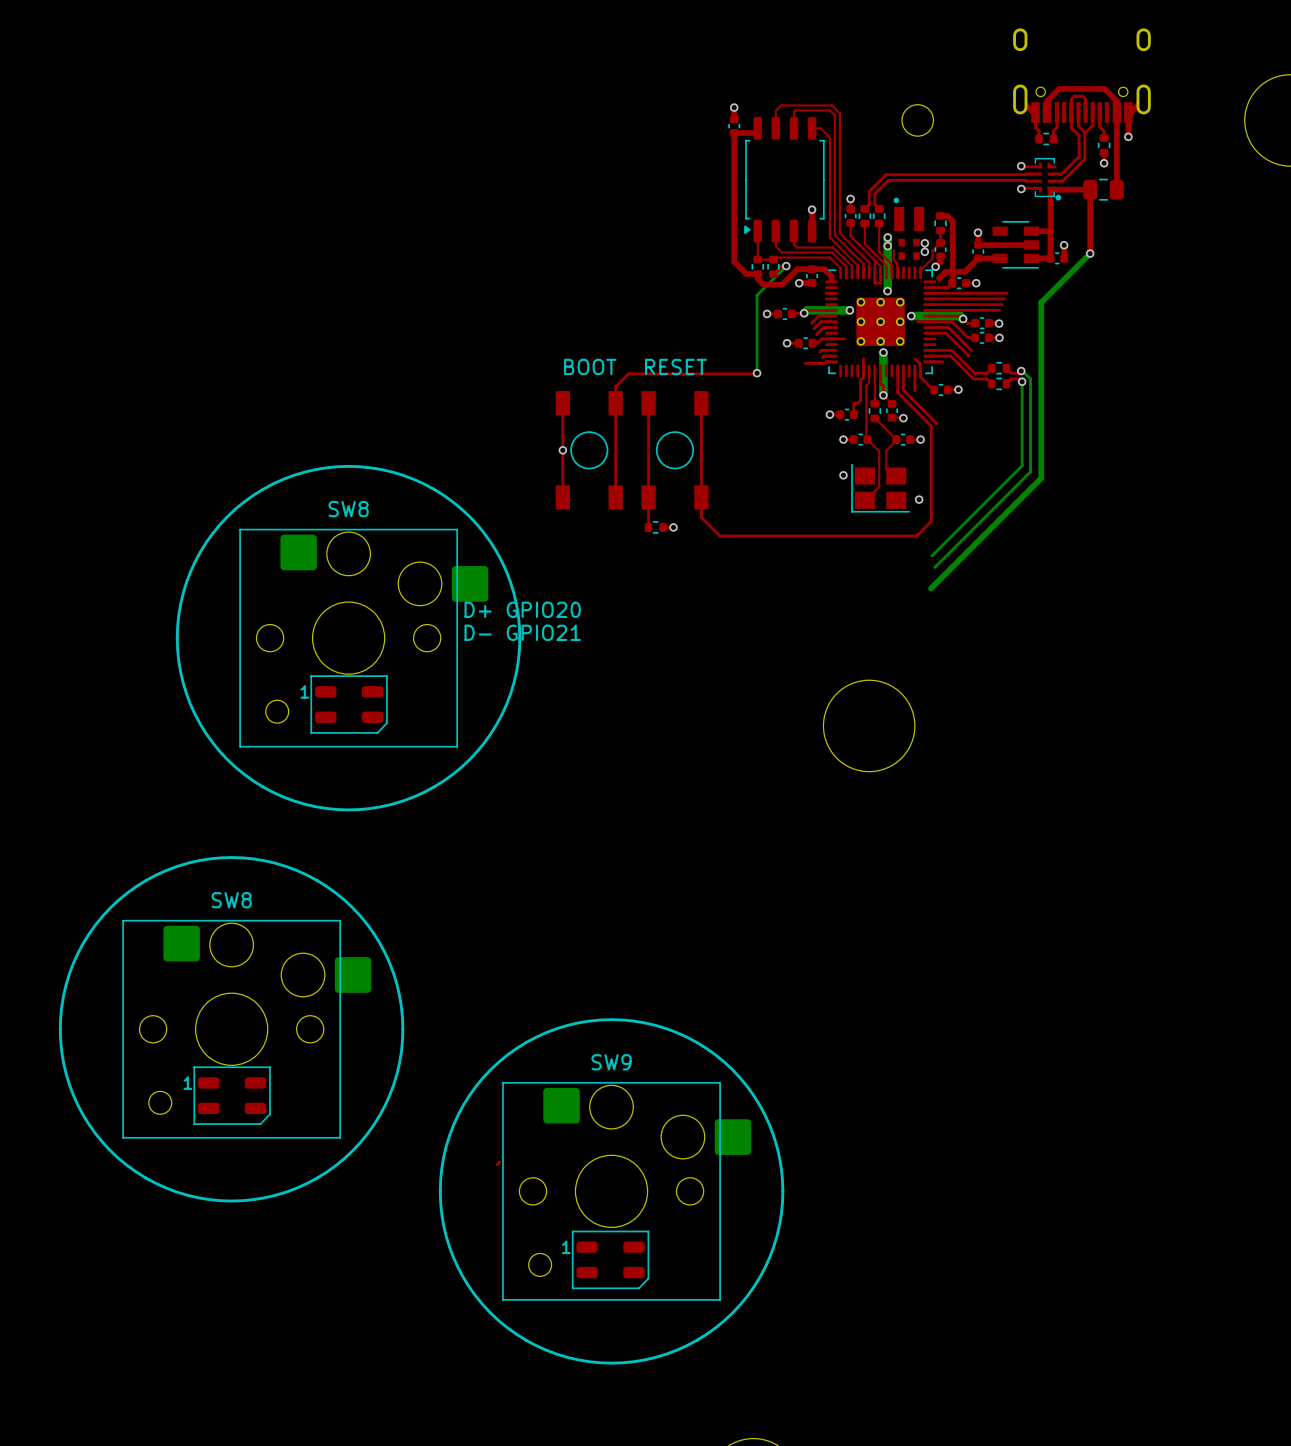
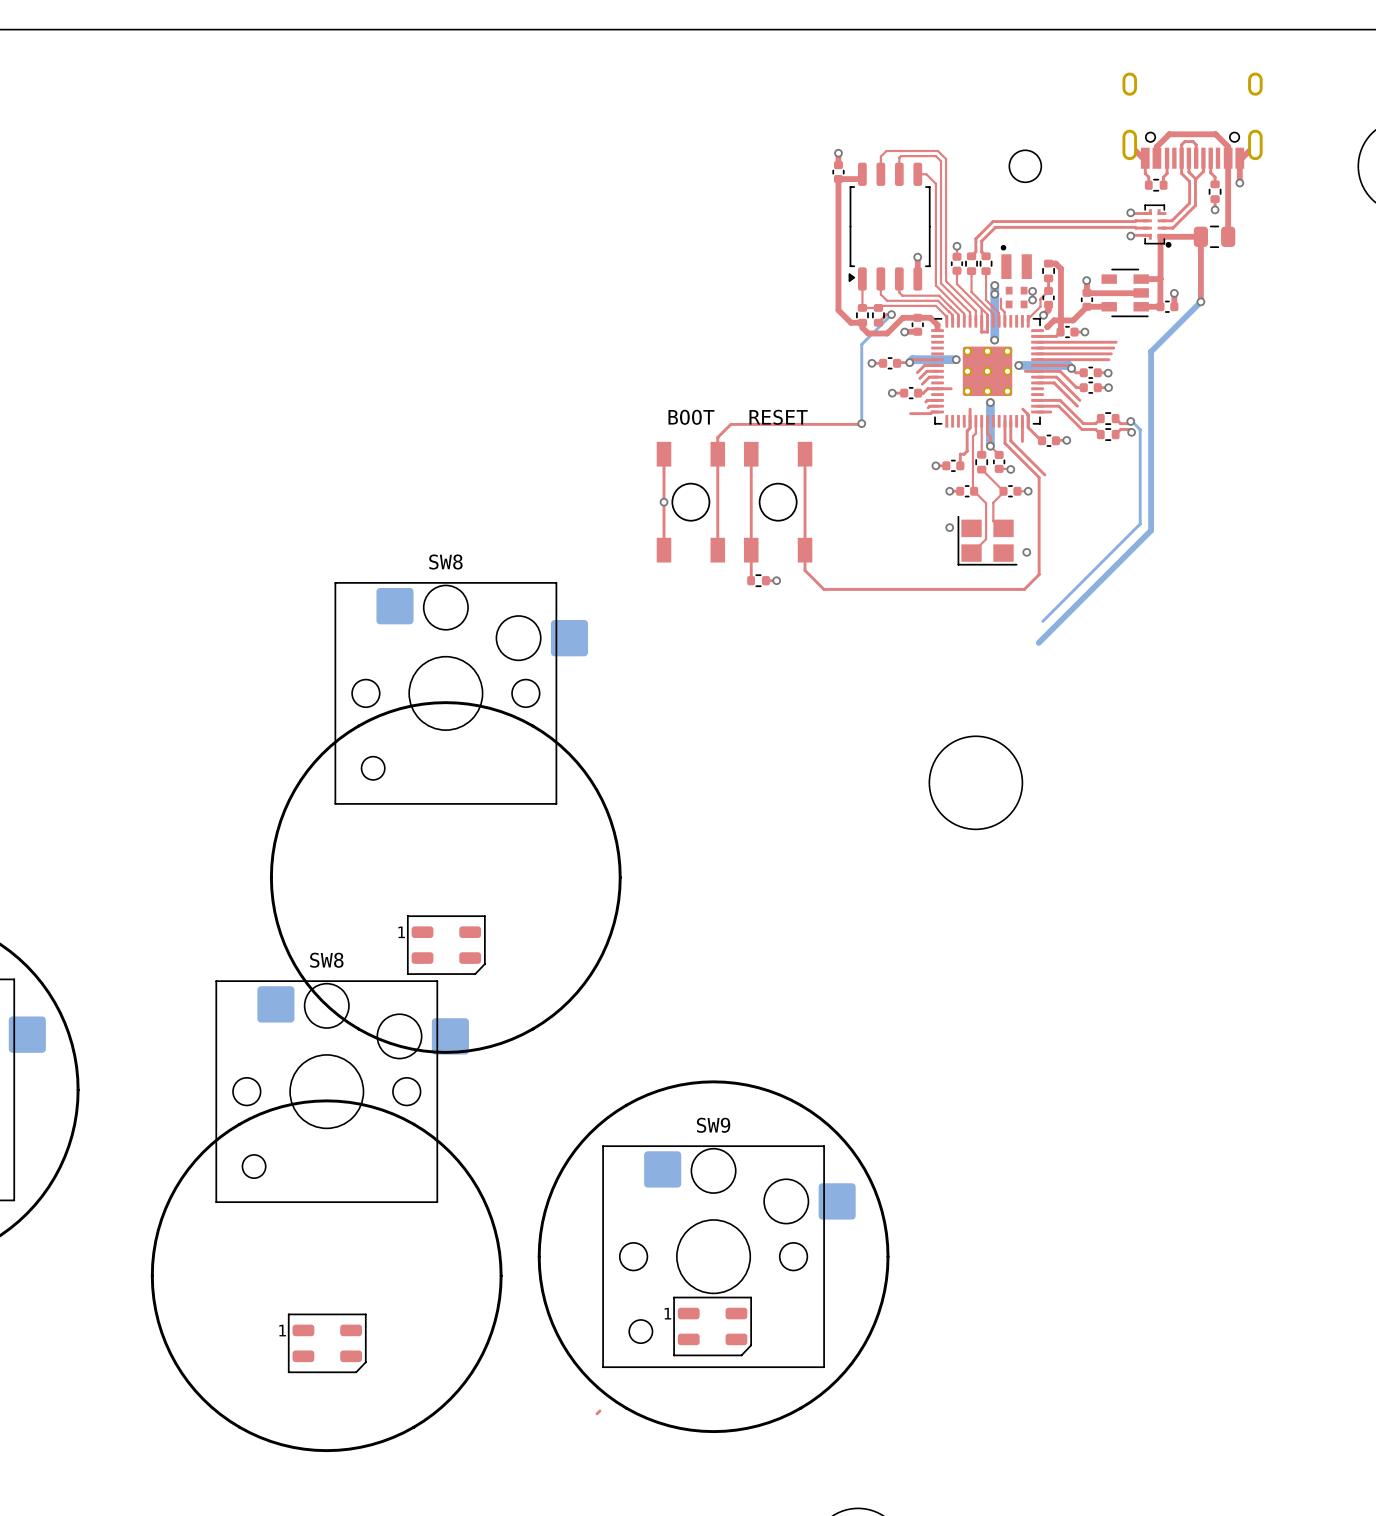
bottom track: (1022, 381) (1022, 465) (932, 556) -> none
line: (262, 489) (235, 509) (212, 533) (194, 562) (183, 593) (177, 626) (178, 660) (186, 693) (200, 724) (219, 751) (244, 774) (272, 792) (304, 804) (337, 809) (370, 808) (403, 800) (434, 786) (461, 767) (484, 742) (502, 714) (513, 682) (519, 649) (518, 615) (510, 582) (496, 552) (477, 525) (453, 502) (424, 484) (392, 472) (359, 466) (326, 467) (293, 475) (262, 489) -> (358, 726) (330, 746) (307, 771) (289, 800) (277, 831) (271, 865) (272, 900) (280, 934) (294, 964) (314, 992) (339, 1016) (368, 1034) (401, 1046) (434, 1052) (468, 1050) (501, 1043) (533, 1028) (561, 1008) (584, 983) (602, 954) (614, 923) (619, 889) (618, 854) (610, 821) (596, 790) (577, 762) (552, 738) (522, 720) (490, 708) (457, 703) (423, 704) (390, 711) (358, 726)
text: D+ GPIO20 (522, 609) -> none
text: D- GPIO21 (522, 632) -> none
part: (349, 704) -> none
line: (145, 880) (118, 900) (95, 924) (78, 953) (66, 984) (60, 1017) (61, 1052) (69, 1084) (83, 1115) (102, 1142) (127, 1165) (156, 1183) (187, 1195) (220, 1200) (253, 1199) (286, 1192) (317, 1178) (344, 1158) (367, 1133) (385, 1105) (396, 1074) (402, 1040) (401, 1006) (393, 973) (379, 943) (360, 916) (336, 893) (307, 875) (275, 863) (242, 857) (209, 858) (176, 866) (145, 880) -> (239, 1124) (211, 1144) (188, 1169) (170, 1198) (158, 1230) (152, 1264) (153, 1298) (161, 1332) (175, 1363) (195, 1390) (220, 1414) (249, 1432) (281, 1444) (315, 1450) (349, 1449) (382, 1441) (413, 1427) (442, 1406) (465, 1382) (483, 1353) (495, 1321) (500, 1287) (499, 1252) (491, 1219) (477, 1188) (458, 1160) (433, 1137) (403, 1118) (371, 1106) (338, 1101) (304, 1102) (271, 1110) (239, 1124)
part: none -> (446, 945)
part: (232, 1095) -> none
top track: (499, 1162) (497, 1164) -> (599, 1410) (596, 1413)
part: none -> (327, 1343)

